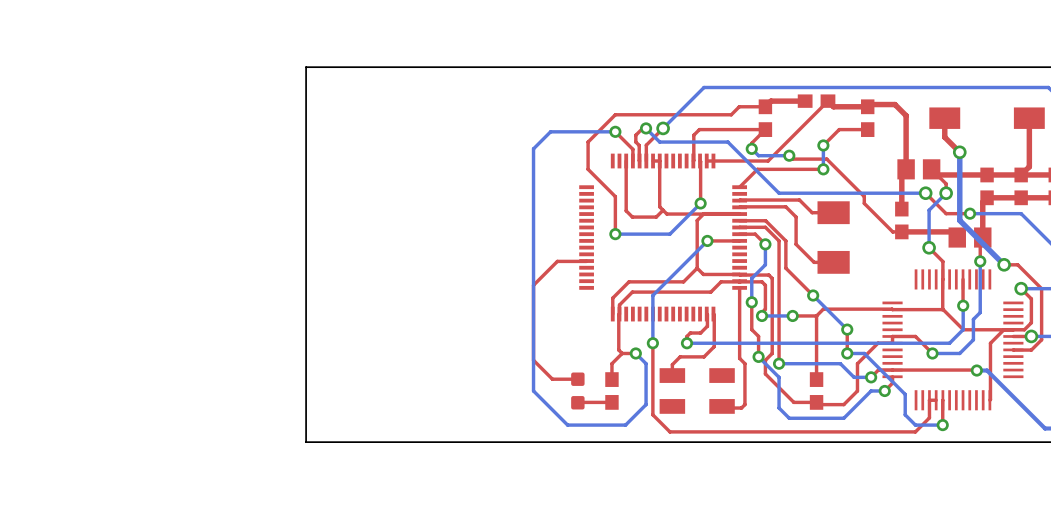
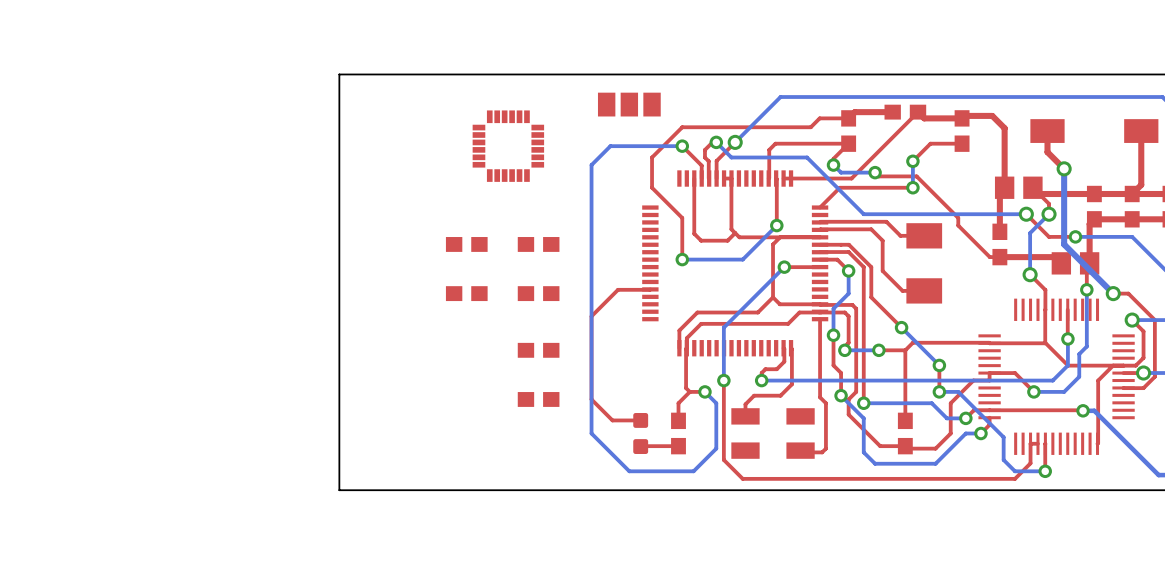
part: none -> (629, 104)
part: none -> (508, 146)
part: none -> (466, 244)
part: none -> (538, 244)
part: none -> (466, 293)
part: none -> (538, 293)
part: none -> (538, 350)
part: none -> (538, 399)

